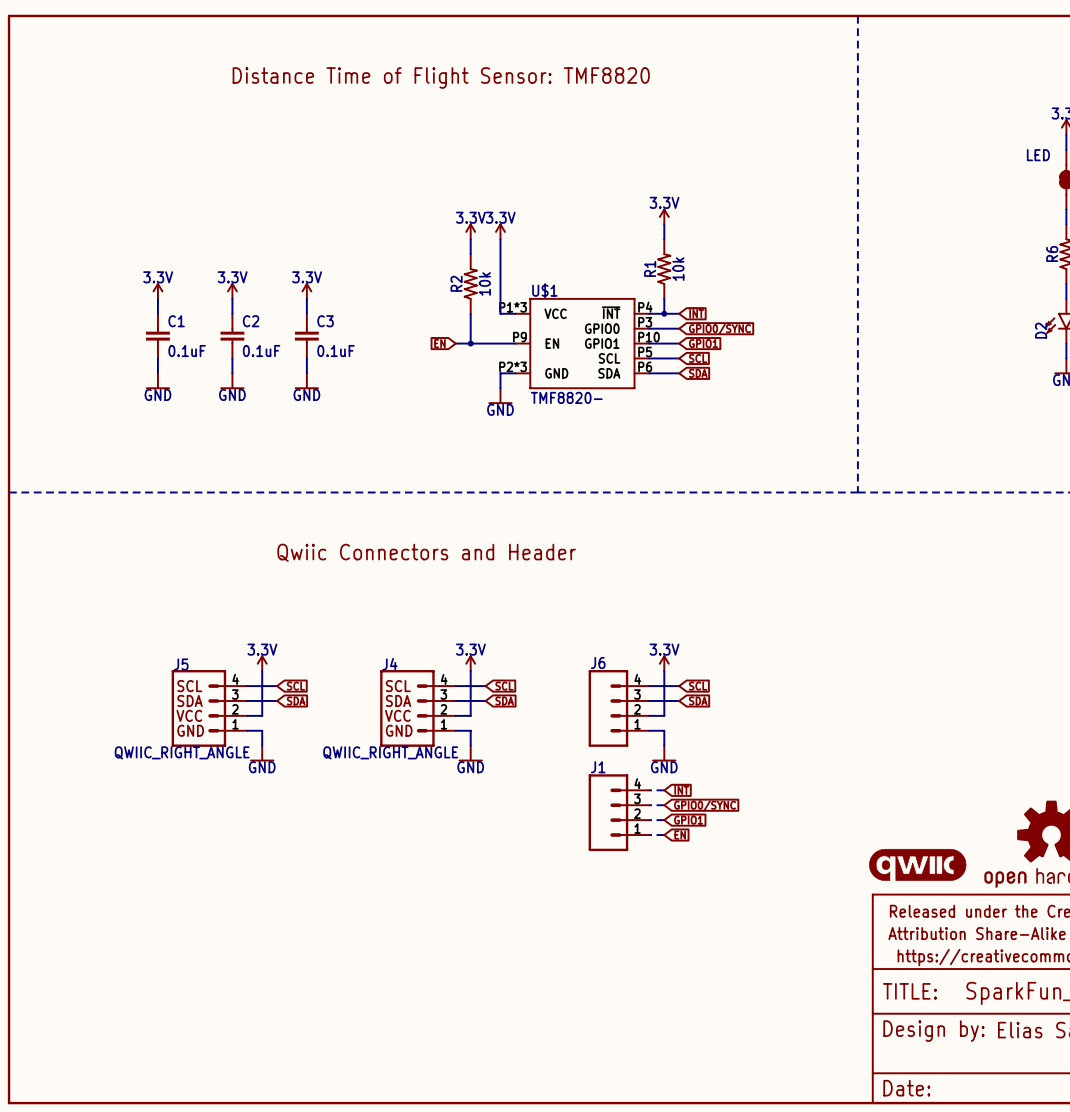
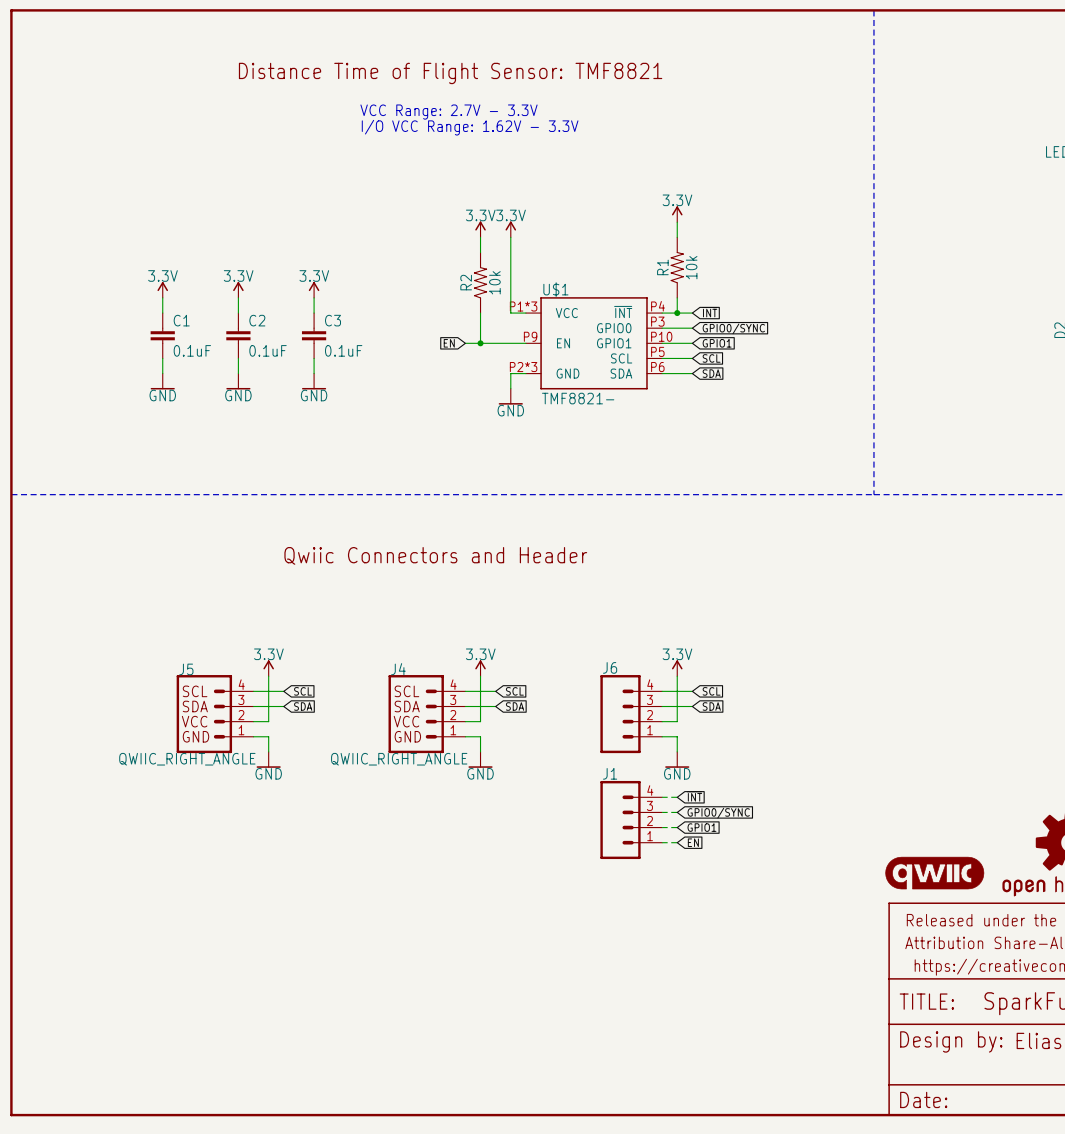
text: Distance Time of Flight Sensor: TMF8820 (441, 77) -> Distance Time of Flight Sensor: TMF8821 (450, 73)
text: none -> VCC Range: 2.7V - 3.3V (449, 112)
text: none -> I/O VCC Range: 1.62V - 3.3V (470, 127)
U$1 value: TMF8820- (566, 397) -> TMF8821- (578, 398)

